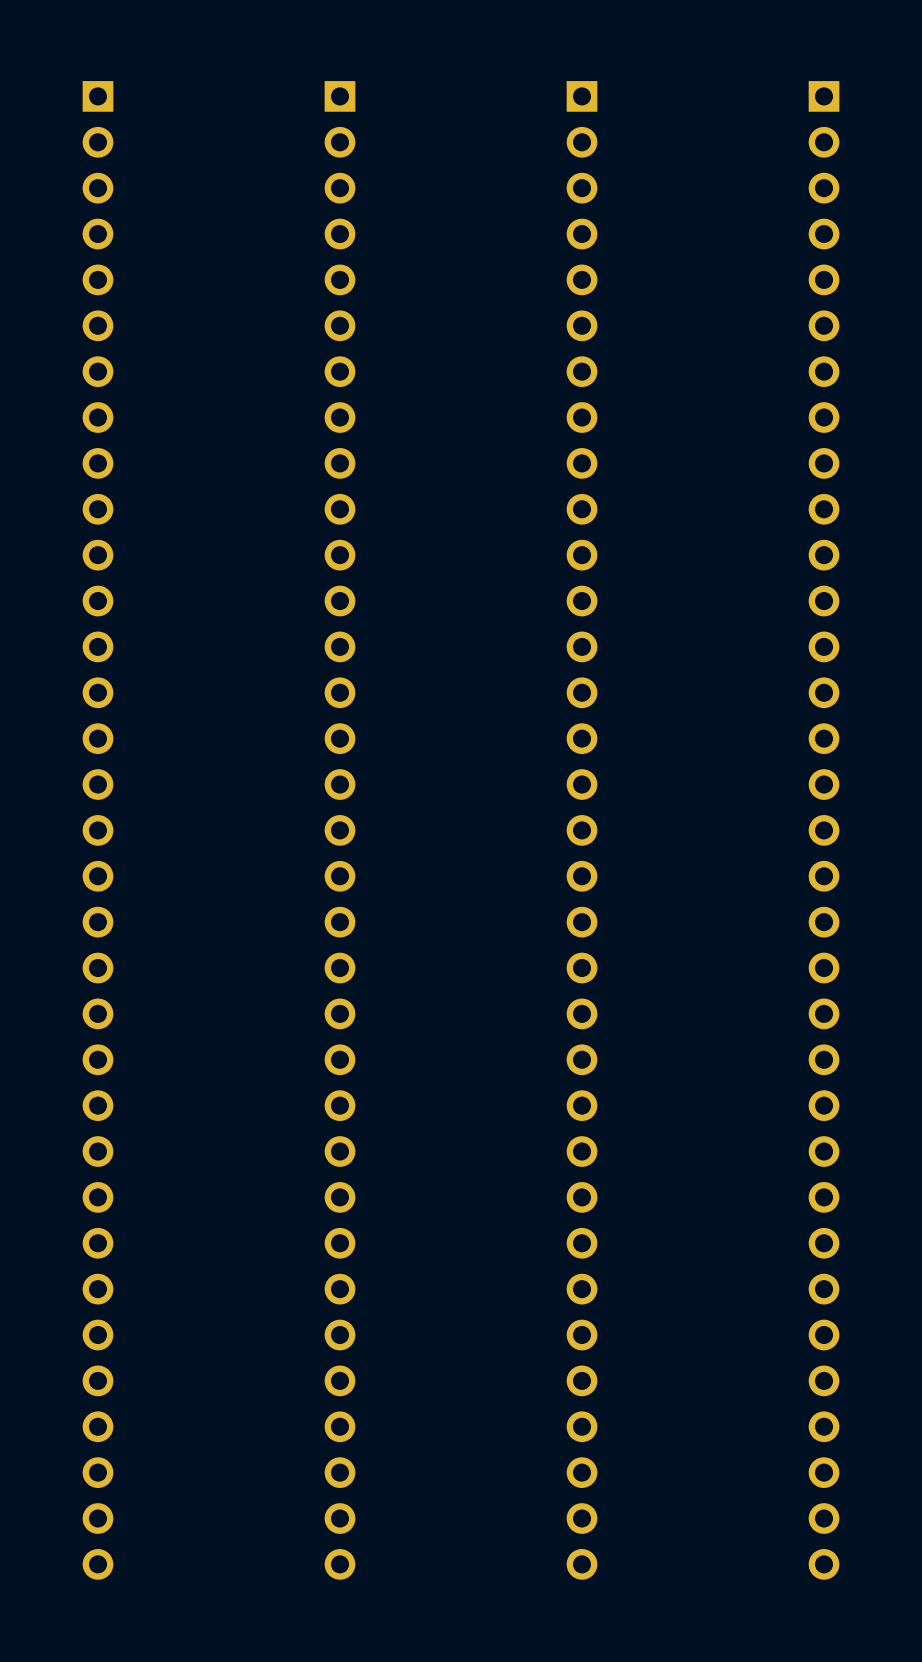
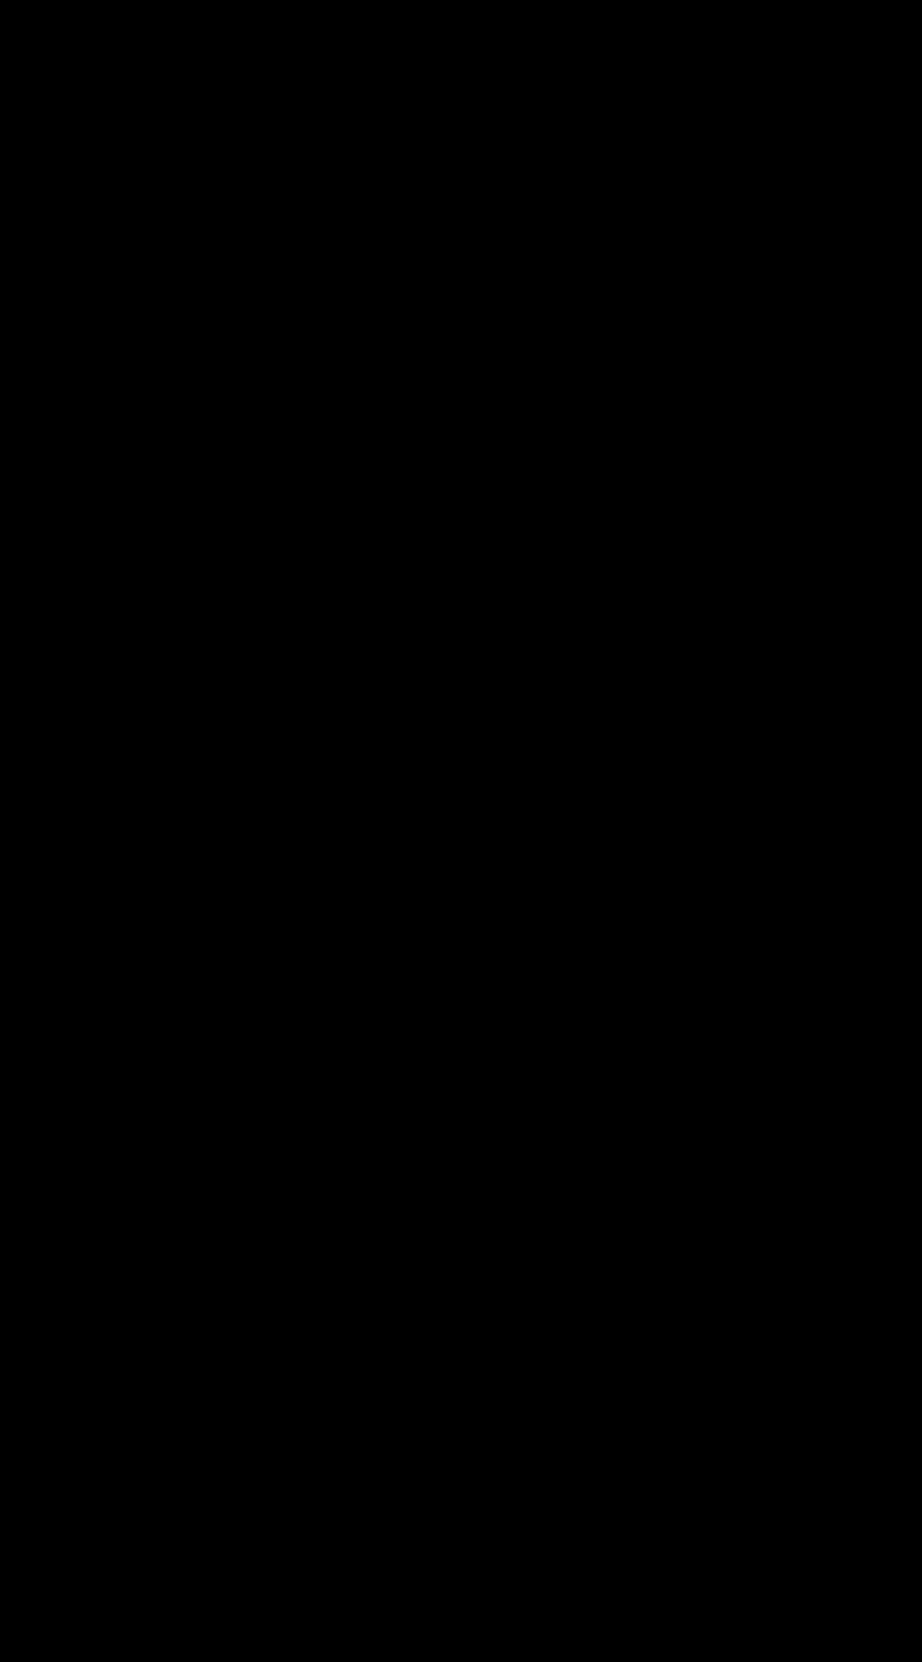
part: (97, 830) -> none
part: (339, 830) -> none
part: (582, 830) -> none
part: (824, 830) -> none

